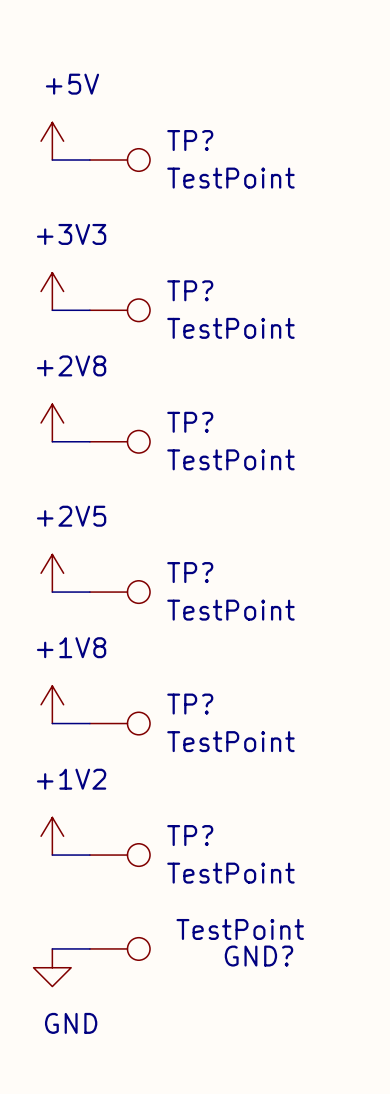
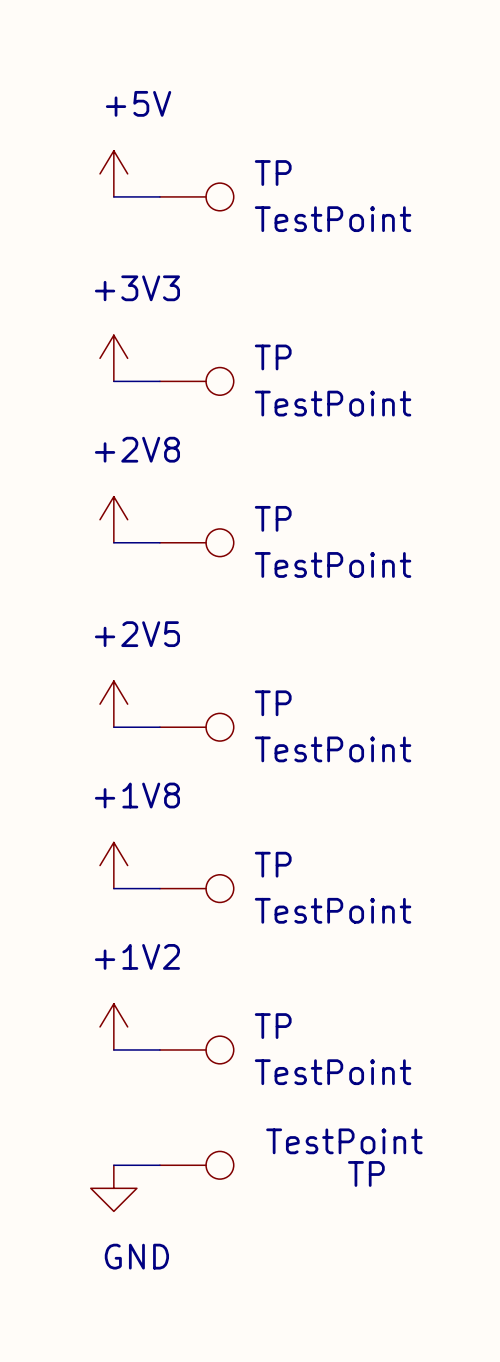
TP? name: TP? (190, 140) -> TP (273, 173)
TP? name: TP? (190, 290) -> TP (273, 357)
TP? name: TP? (190, 422) -> TP (273, 518)
TP? name: TP? (190, 572) -> TP (273, 703)
TP? name: TP? (190, 704) -> TP (273, 864)
TP? name: TP? (190, 835) -> TP (273, 1026)
GND? name: GND? (258, 956) -> TP (366, 1173)

